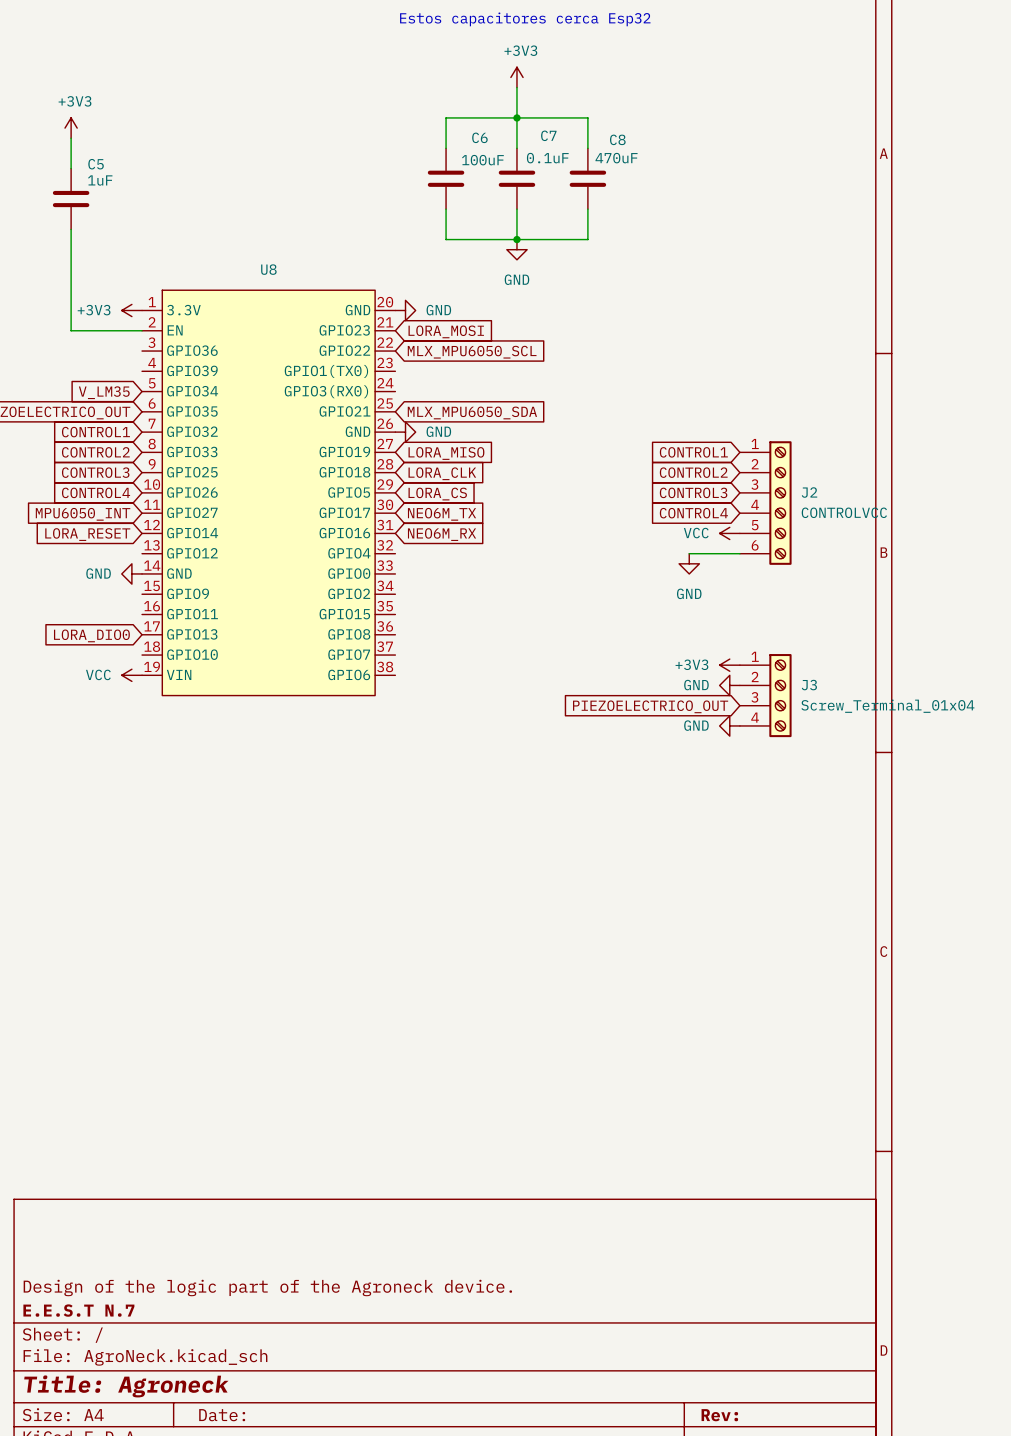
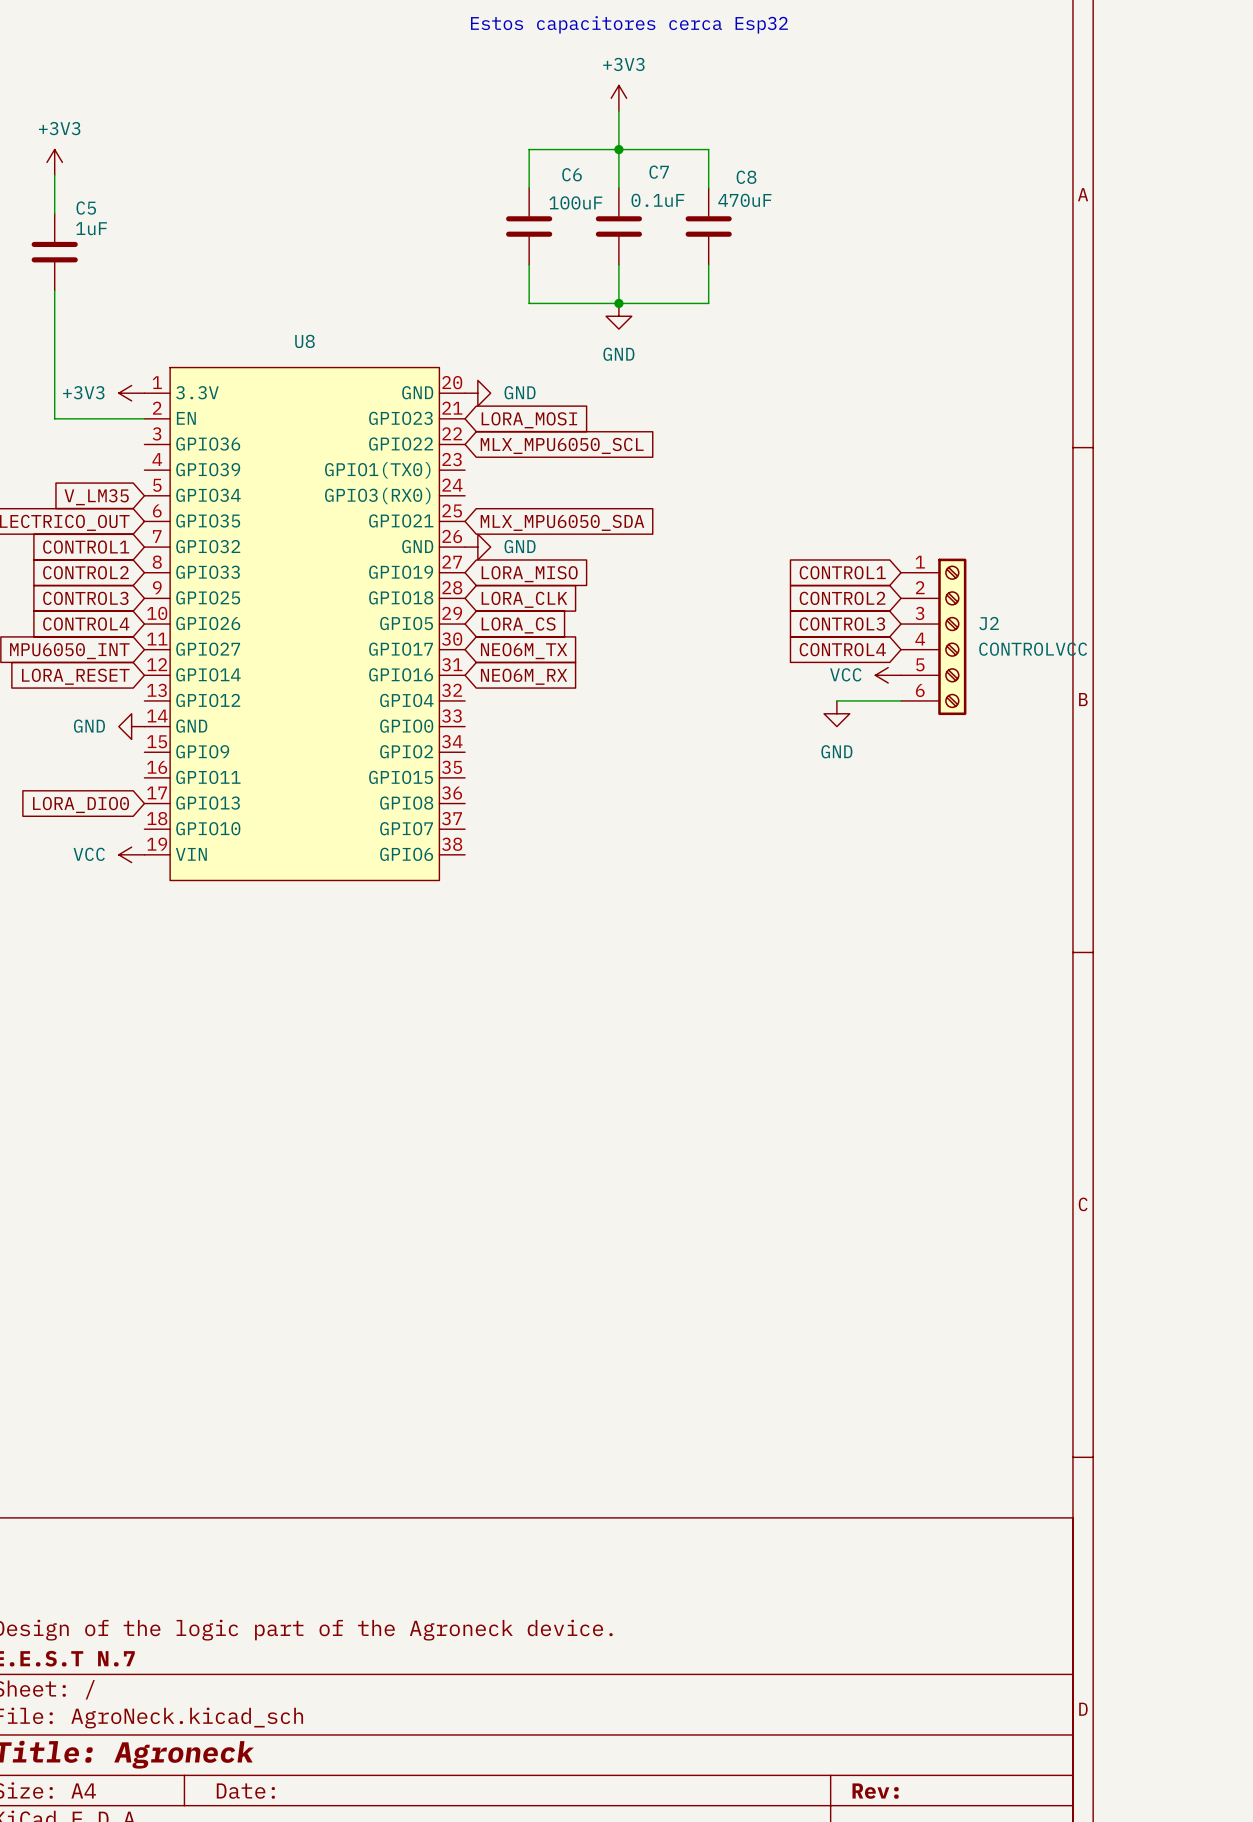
power symbol: +3V3 (729, 665) -> none
power symbol: GND (729, 685) -> none
J3: Screw_Terminal_01x04 (765, 695) -> none
global label: PIEZOELECTRICO_OUT (650, 706) -> none
power symbol: GND (729, 725) -> none

